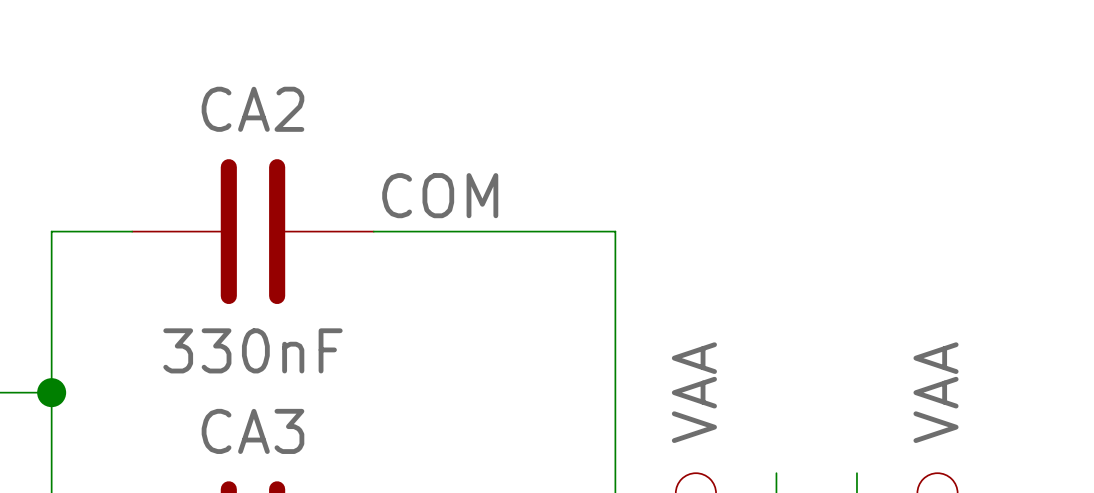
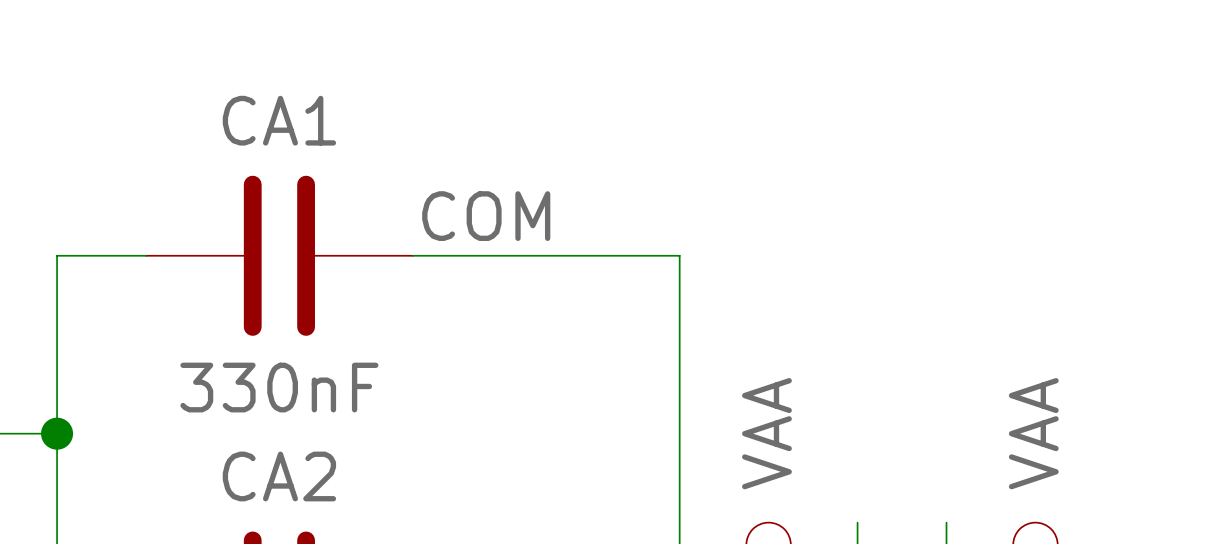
CA2 name: CA2 (252, 109) -> CA1 (279, 120)
CA3 name: CA3 (252, 431) -> CA2 (279, 476)

